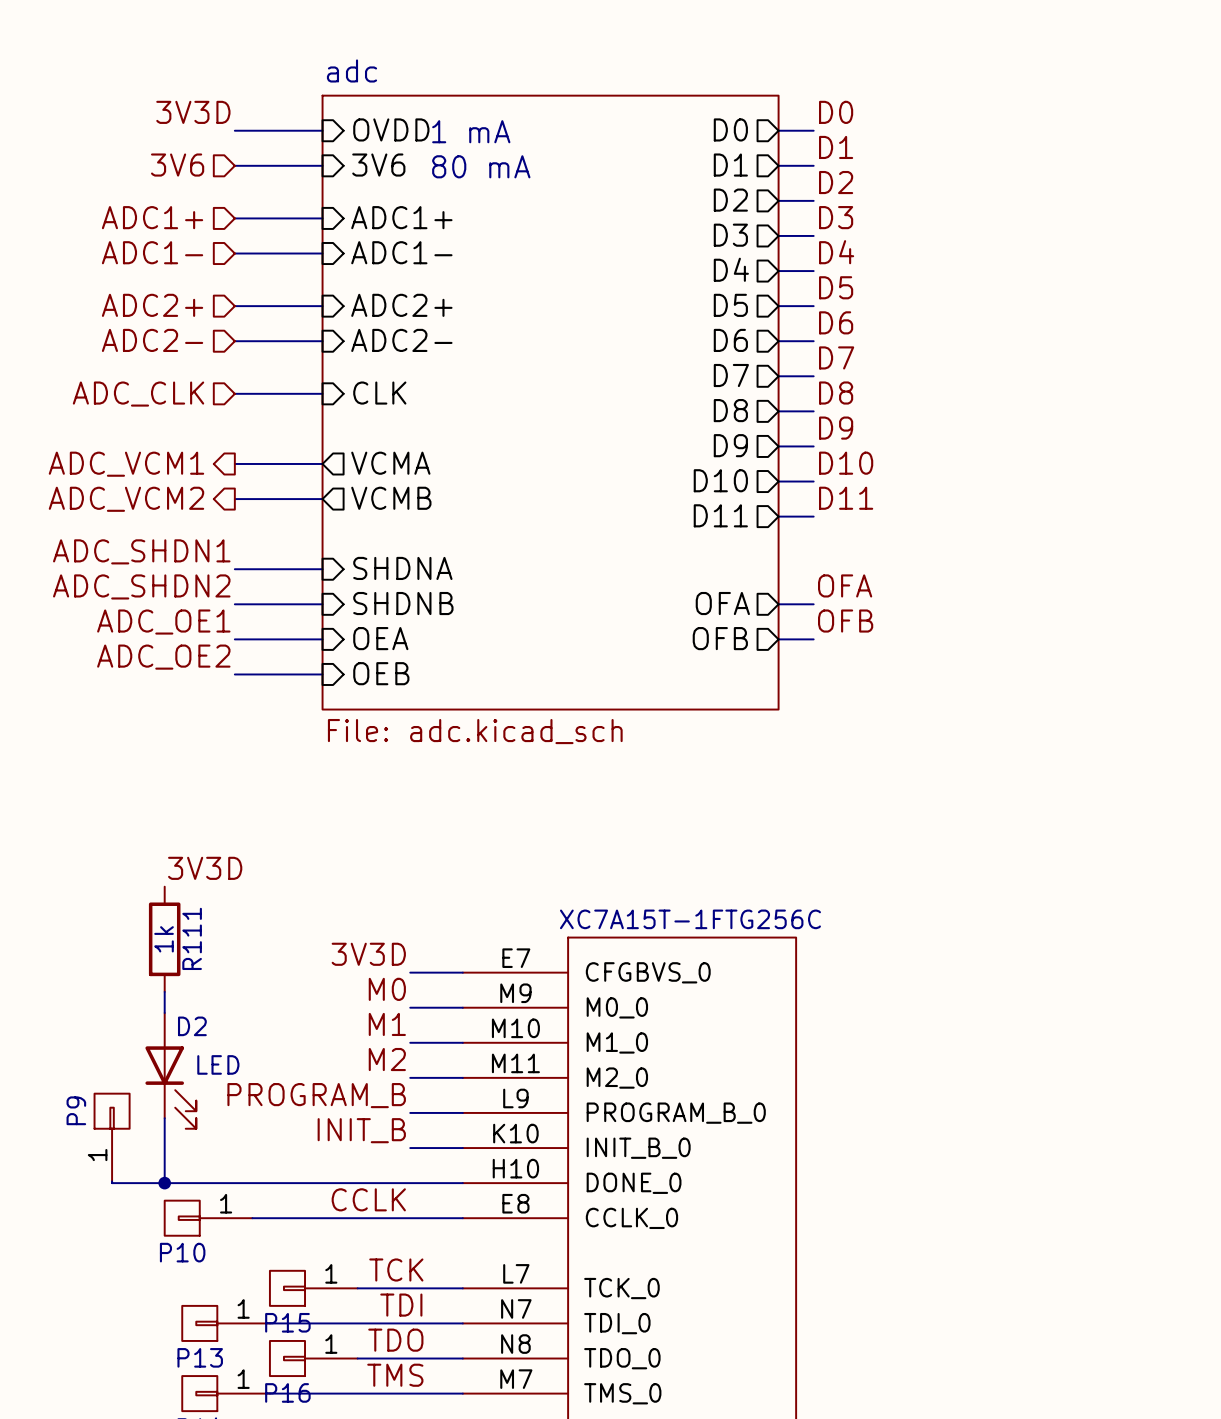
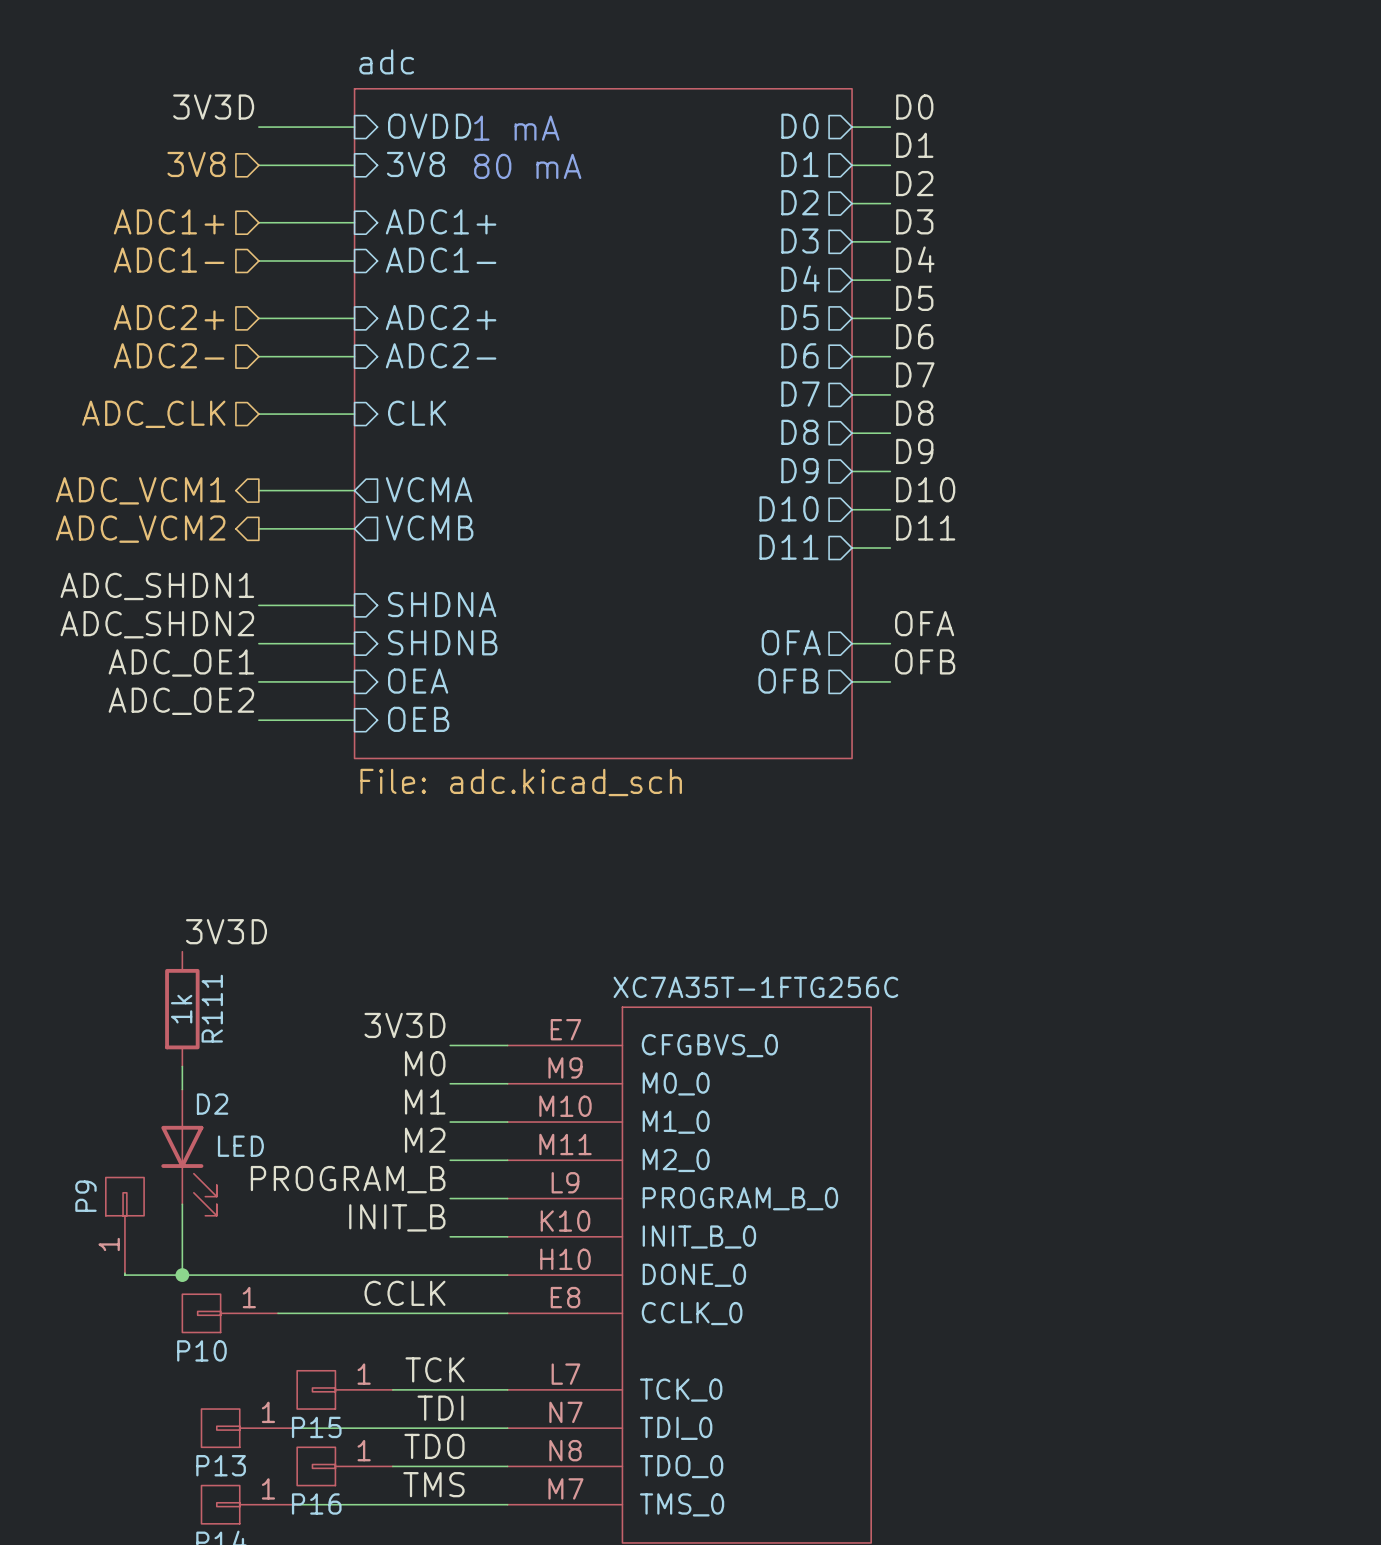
hierarchical label: 3V6 (177, 165) -> 3V8 (196, 164)
sheet pin: 3V6 (378, 165) -> 3V8 (415, 164)
part value: XC7A15T-1FTG256C (690, 919) -> XC7A35T-1FTG256C (755, 987)

